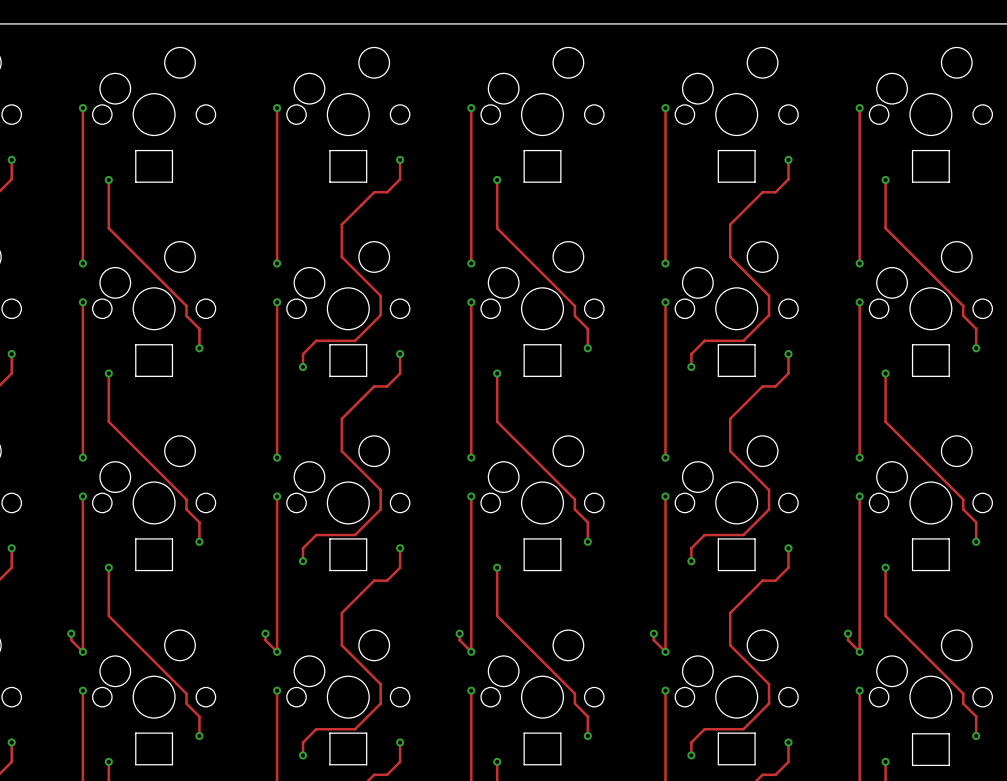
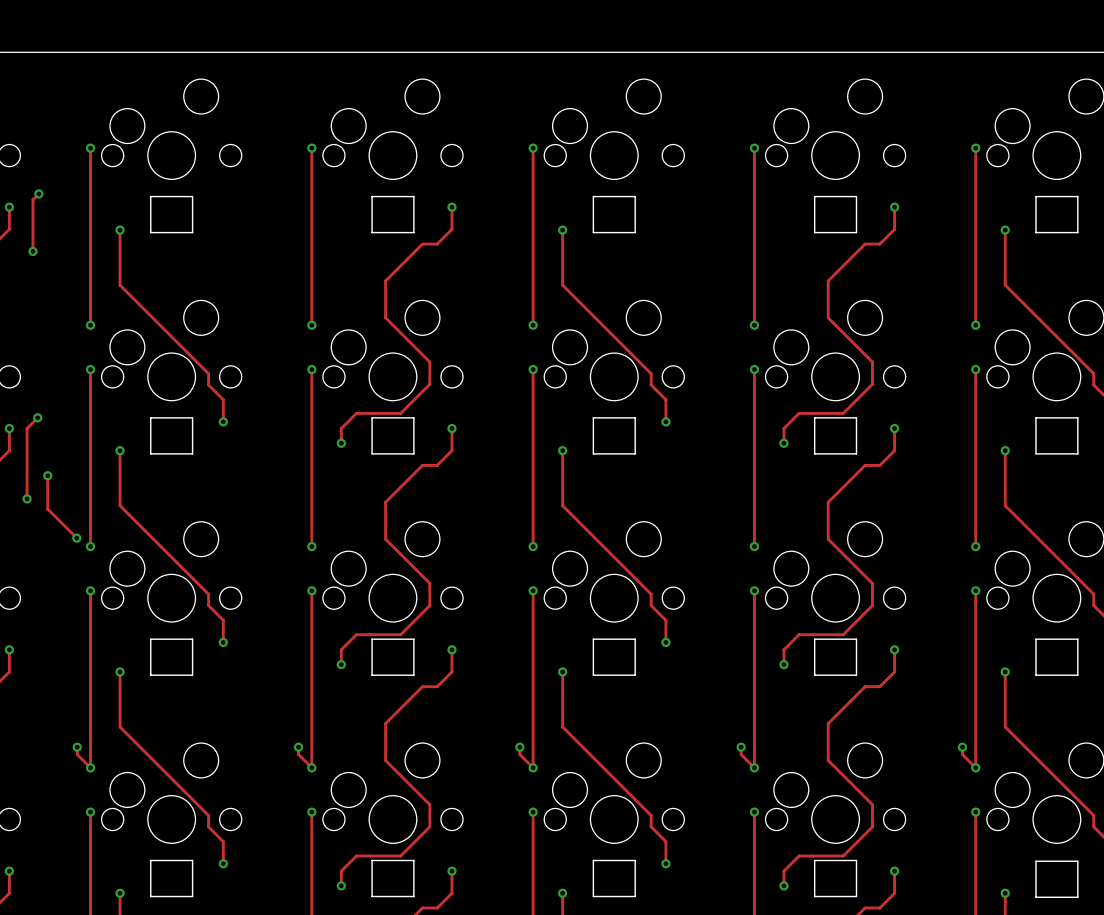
track: none -> (38, 193) (32, 199) (32, 251)
via: none -> (38, 193)
via: none -> (32, 251)
track: none -> (37, 417) (27, 428) (27, 498)
via: none -> (37, 417)
track: none -> (47, 475) (47, 509) (76, 538)
via: none -> (47, 475)
via: none -> (27, 498)
via: none -> (76, 538)

